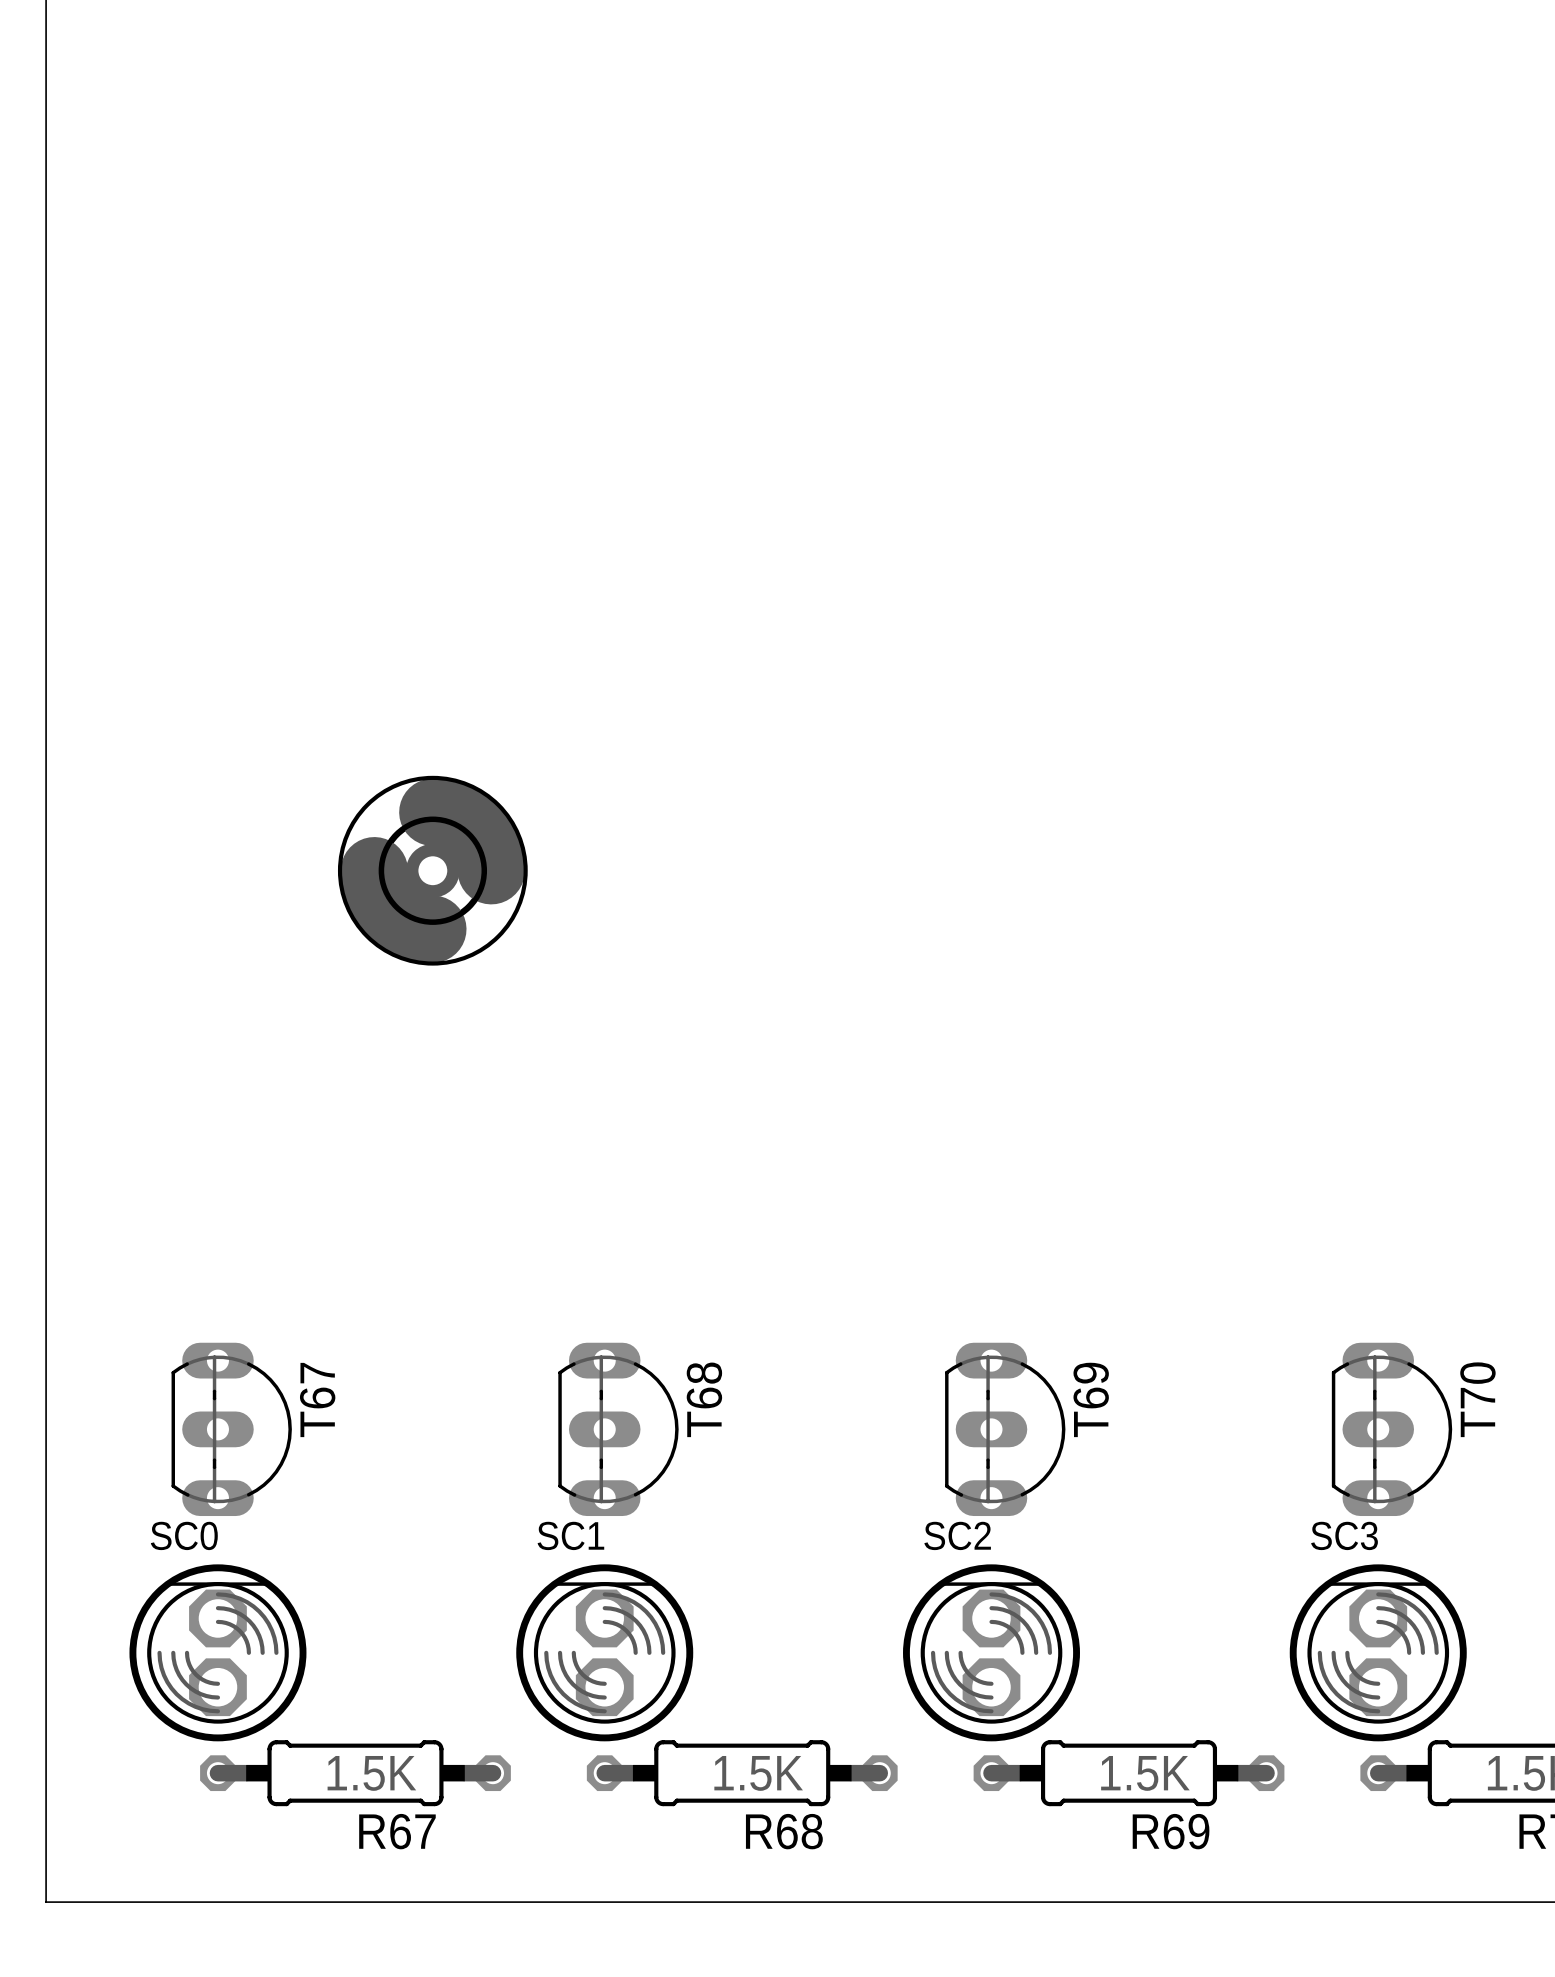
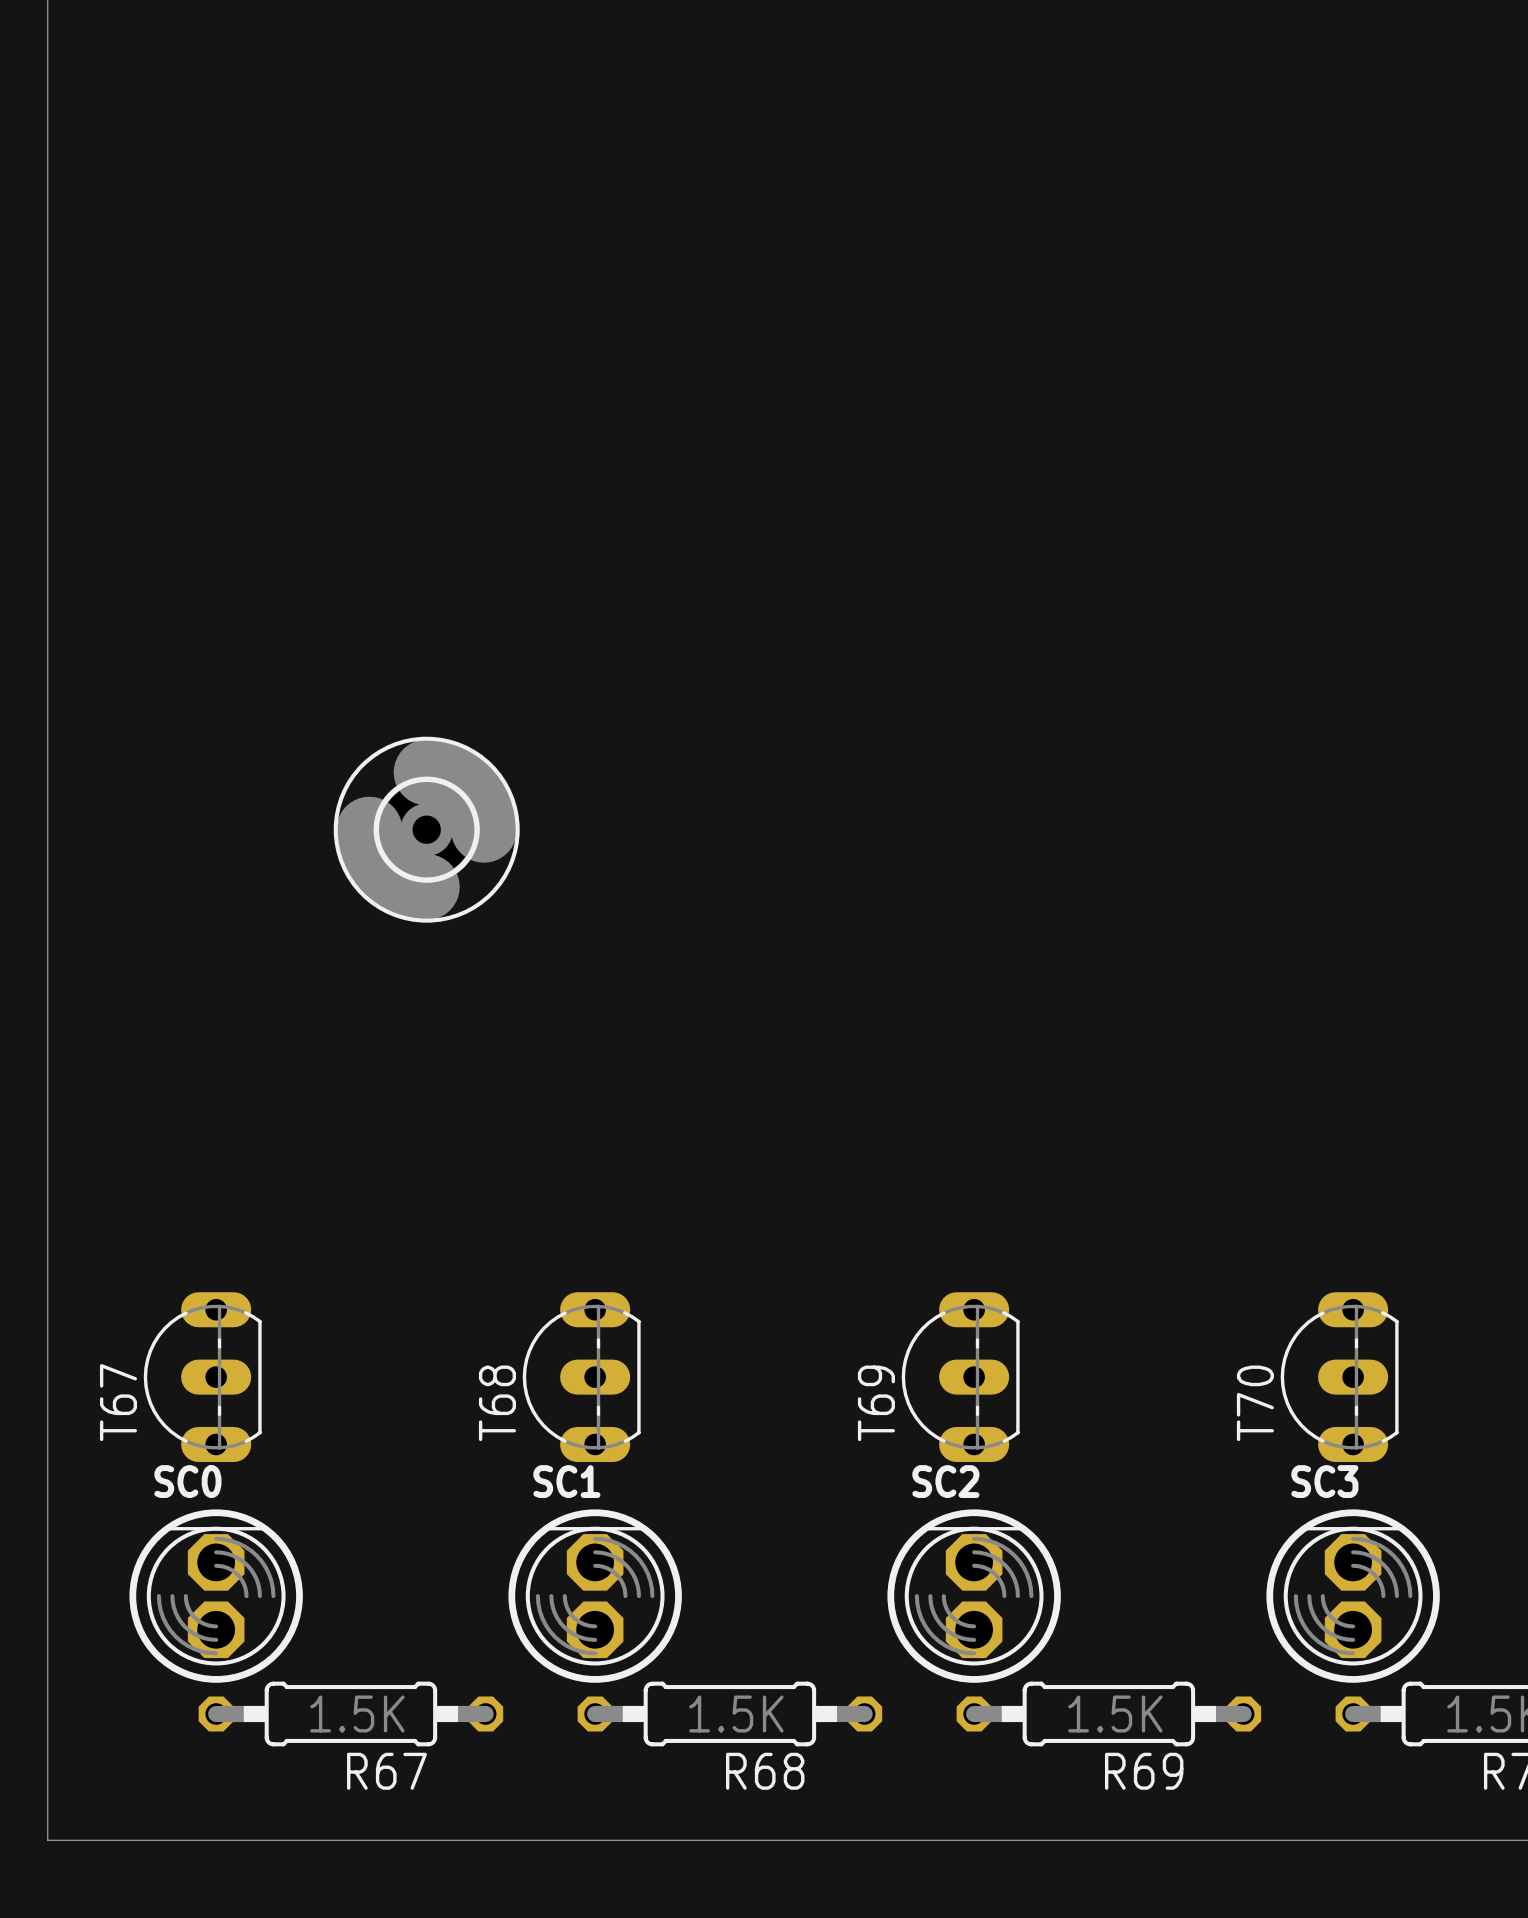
T67 footprint: [171, 1342, 292, 1517] -> [143, 1292, 262, 1463]
T68 footprint: [558, 1342, 679, 1517] -> [522, 1292, 641, 1463]
T69 footprint: [945, 1342, 1066, 1517] -> [901, 1292, 1020, 1463]
T70 footprint: [1331, 1342, 1453, 1517] -> [1280, 1292, 1399, 1463]
T67 name position: T67 (317, 1399) -> T67 (118, 1402)
T68 name position: T68 (704, 1399) -> T68 (497, 1403)
T69 name position: T69 (1091, 1399) -> T69 (876, 1403)
T70 name position: T70 (1477, 1399) -> T70 (1255, 1403)

